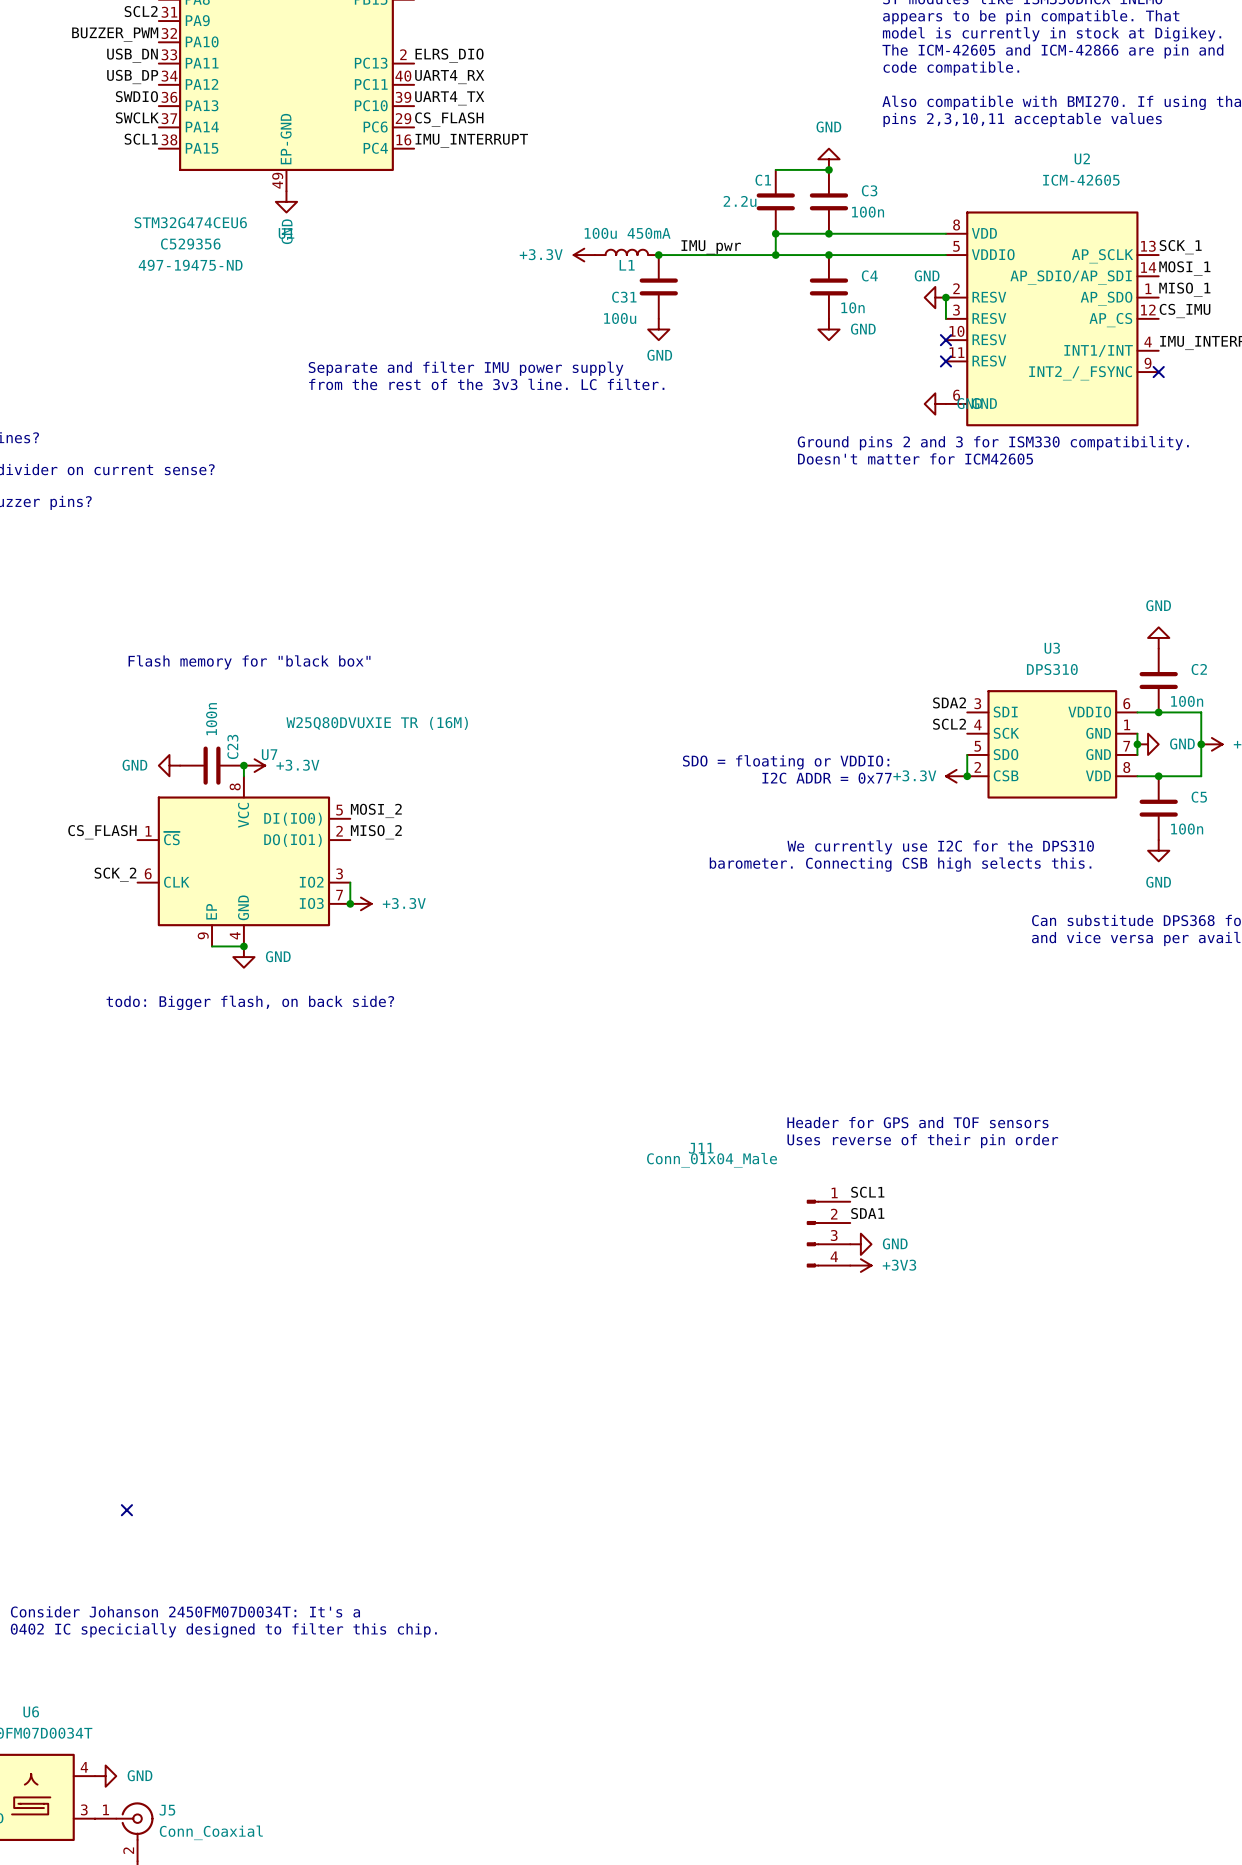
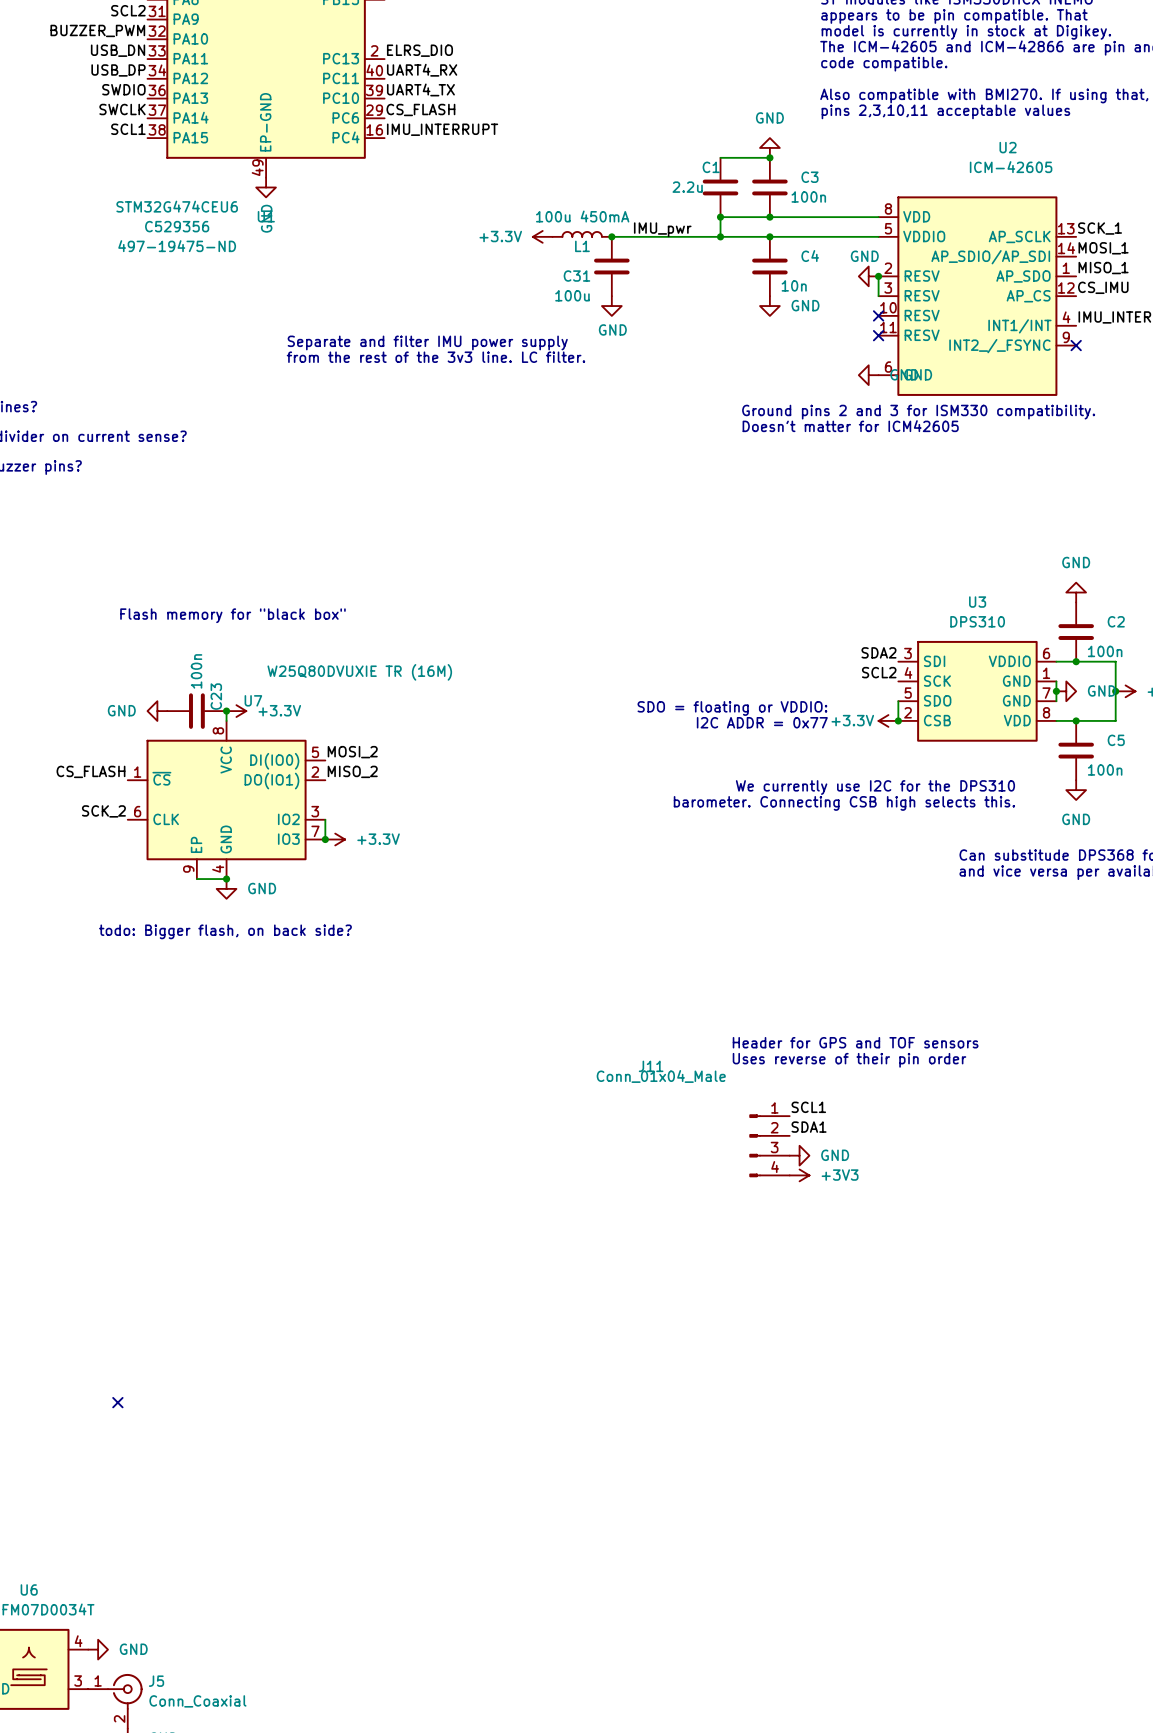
text: Consider Johanson 2450FM07D0034T: It's a (185, 1611) -> none
text: 0402 IC specicially designed to filter this chip. (223, 1630) -> none

